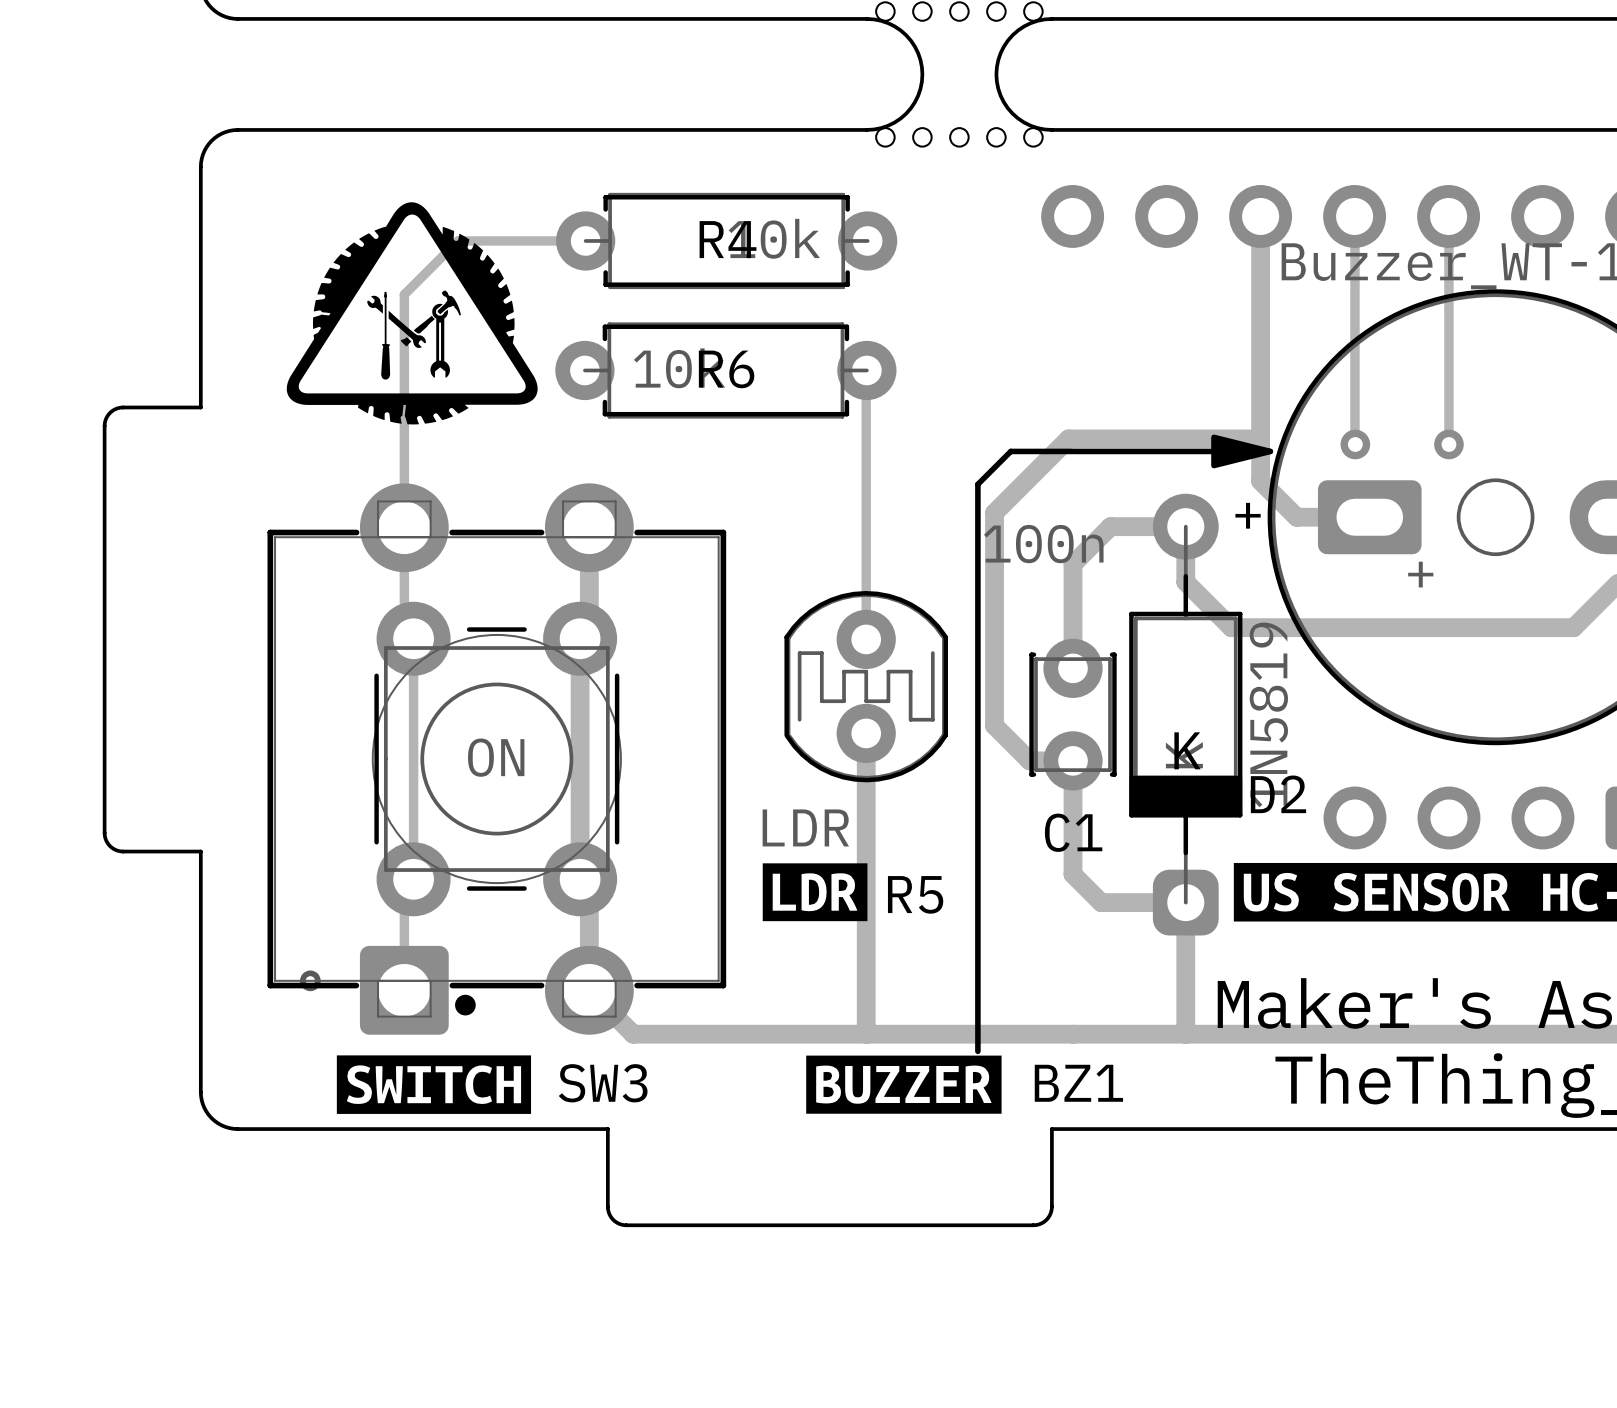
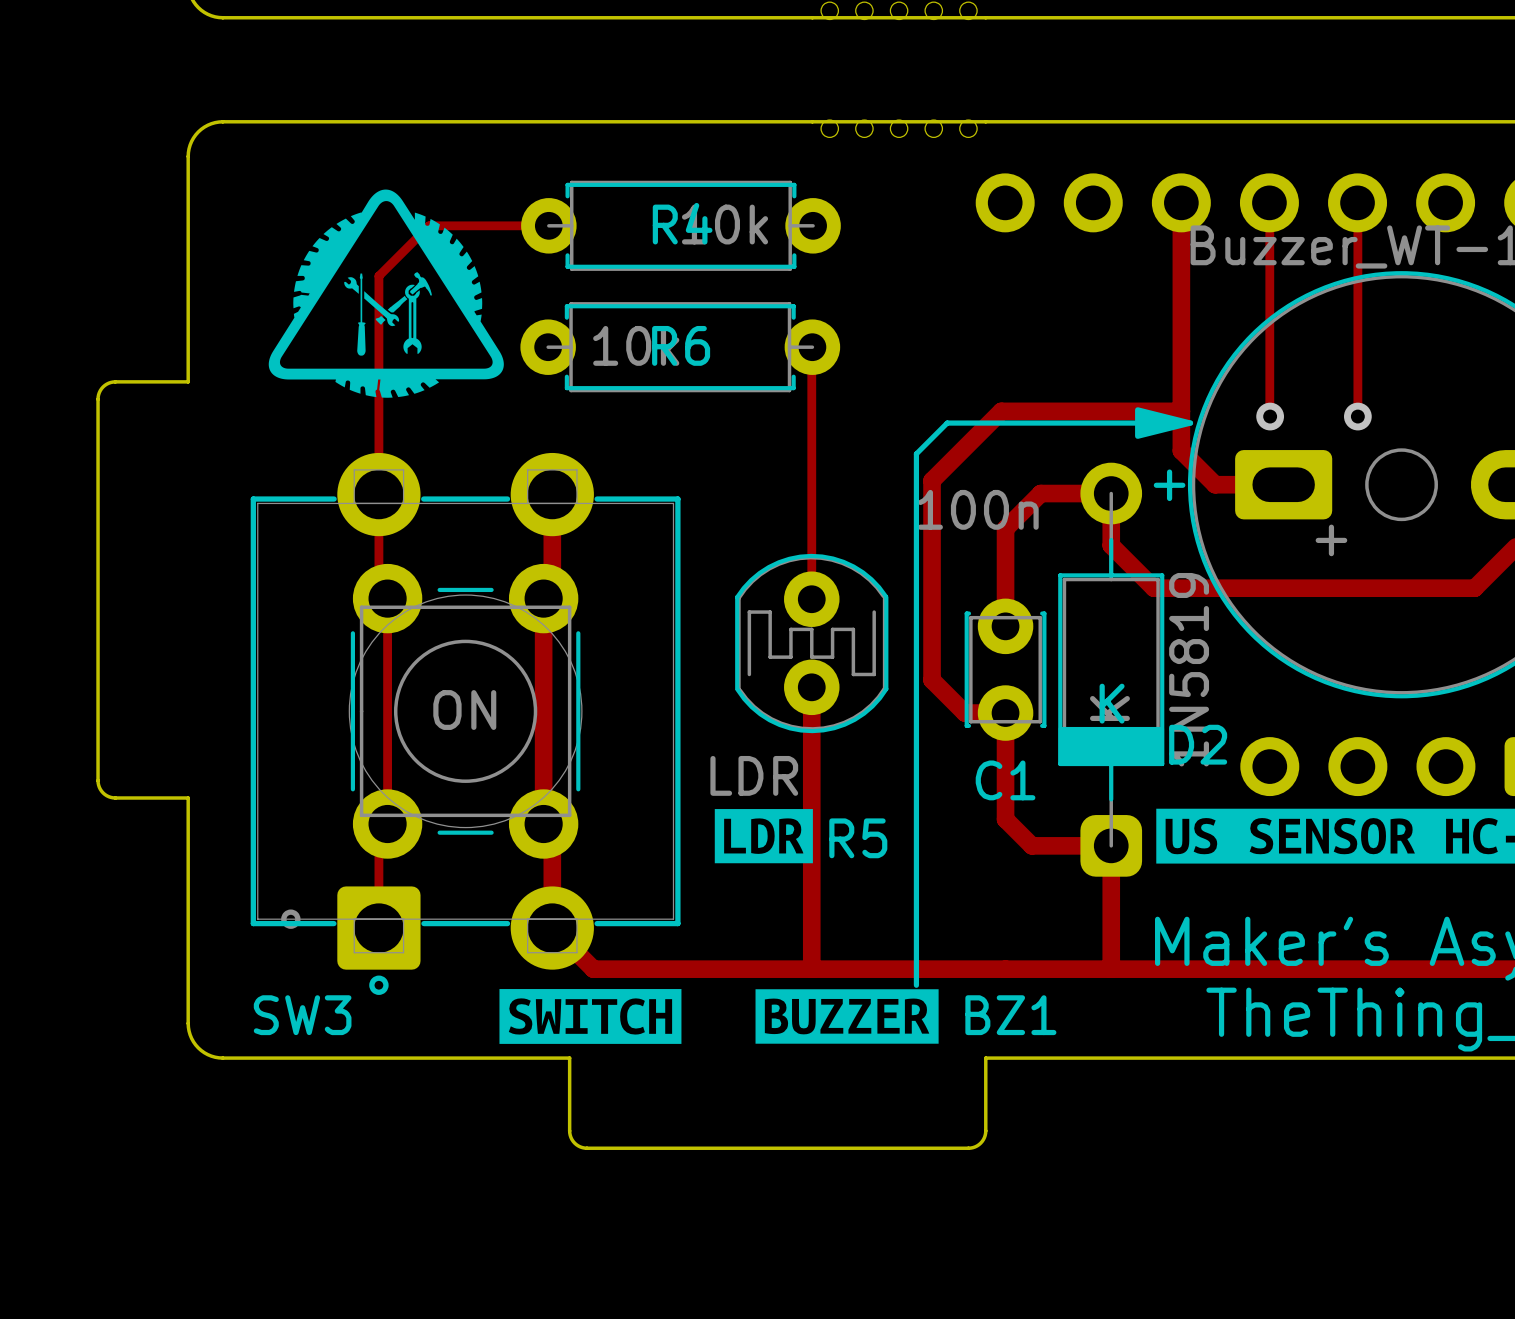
board edge: (866, 18) (888, 23) (906, 35) (918, 53) (922, 74) (918, 95) (906, 113) (888, 125) (866, 129) -> (812, 17) (985, 17)
board edge: (1051, 18) (1030, 23) (1012, 35) (1000, 53) (996, 74) (1000, 95) (1012, 113) (1030, 125) (1051, 129) -> (812, 121) (985, 121)
SW3 footprint: [267, 483, 727, 1035] -> [250, 452, 681, 995]
SW3 name position: SW3 (603, 1083) -> SW3 (302, 1015)
drawing position: (433, 1084) -> (590, 1016)

